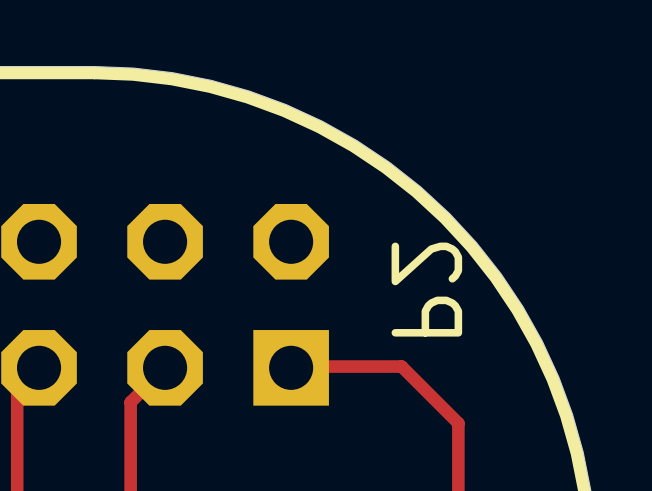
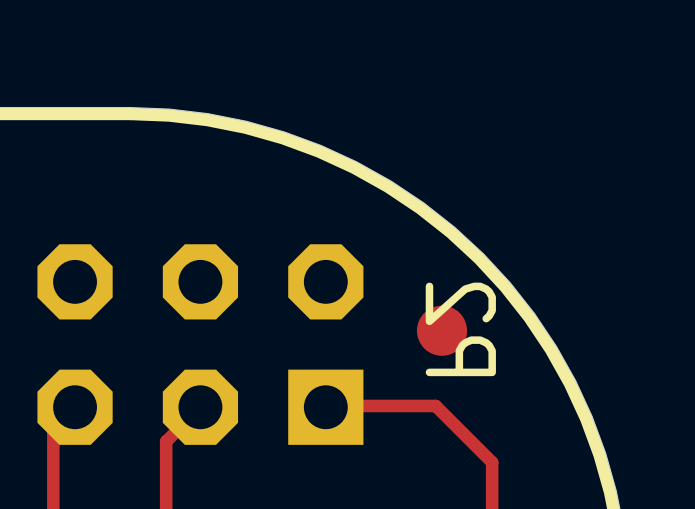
part: none -> (442, 330)

